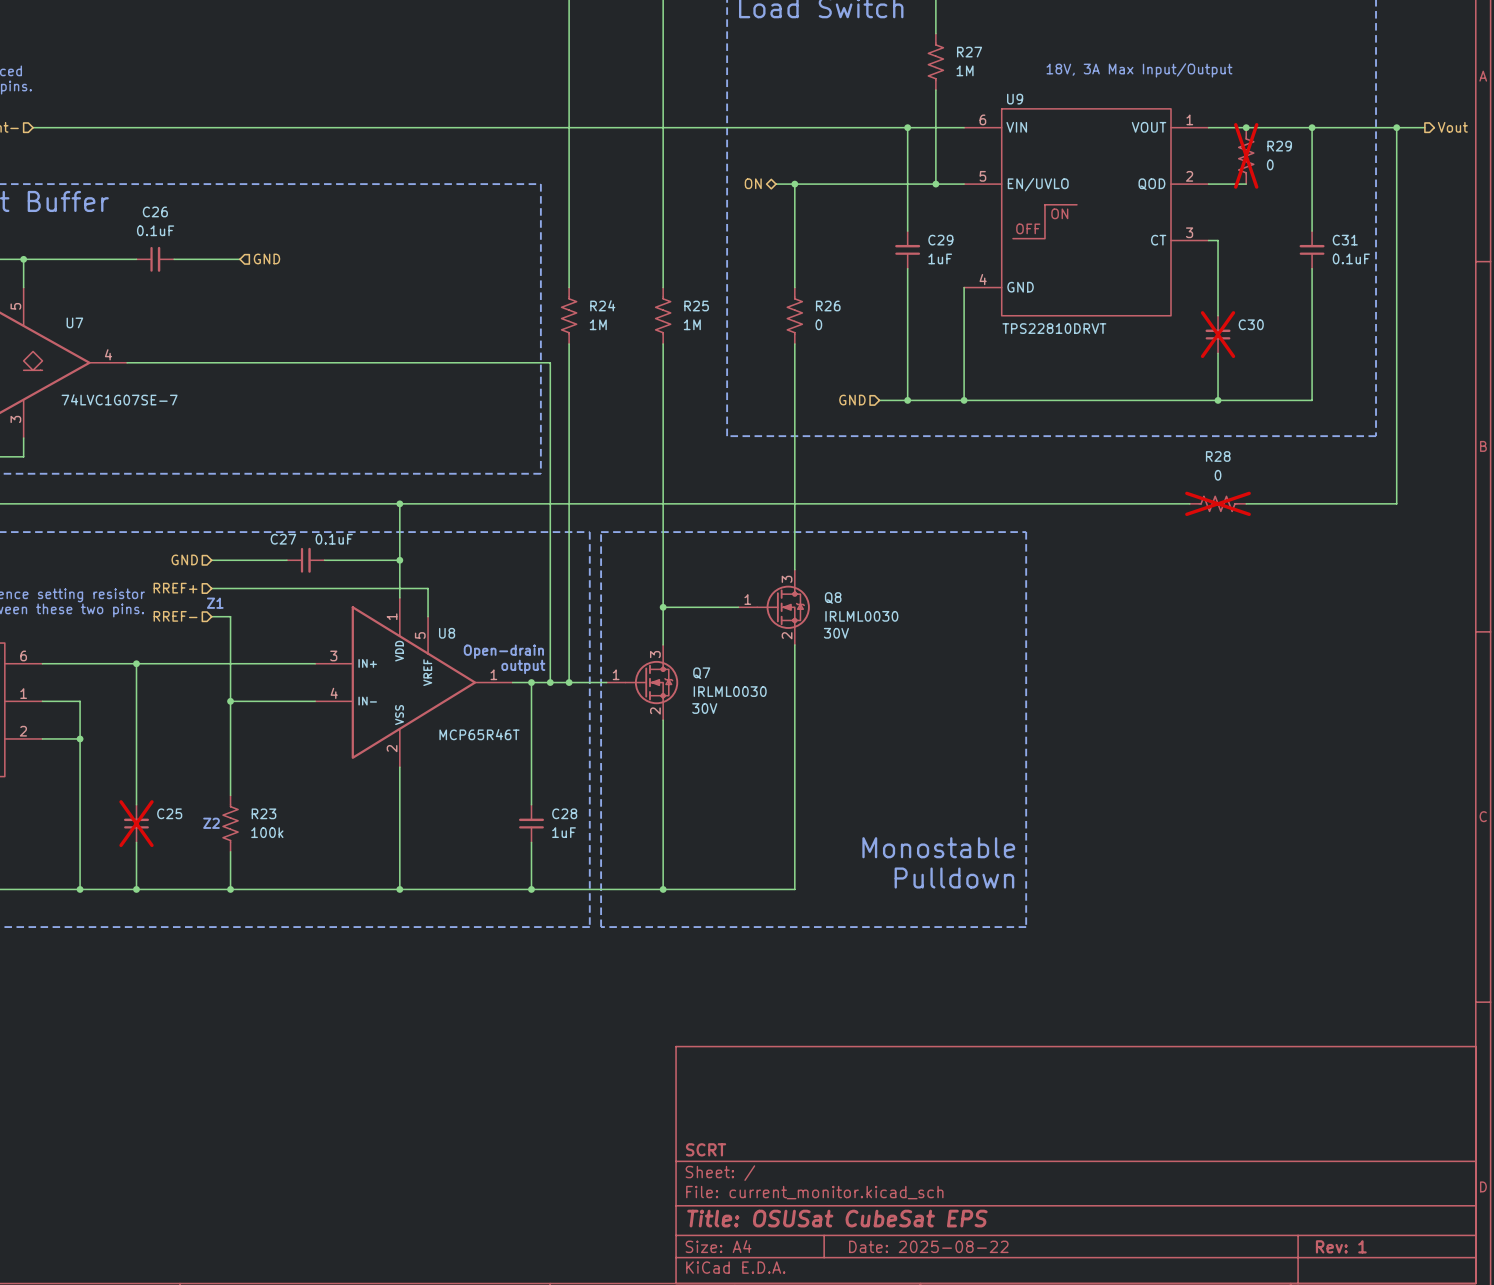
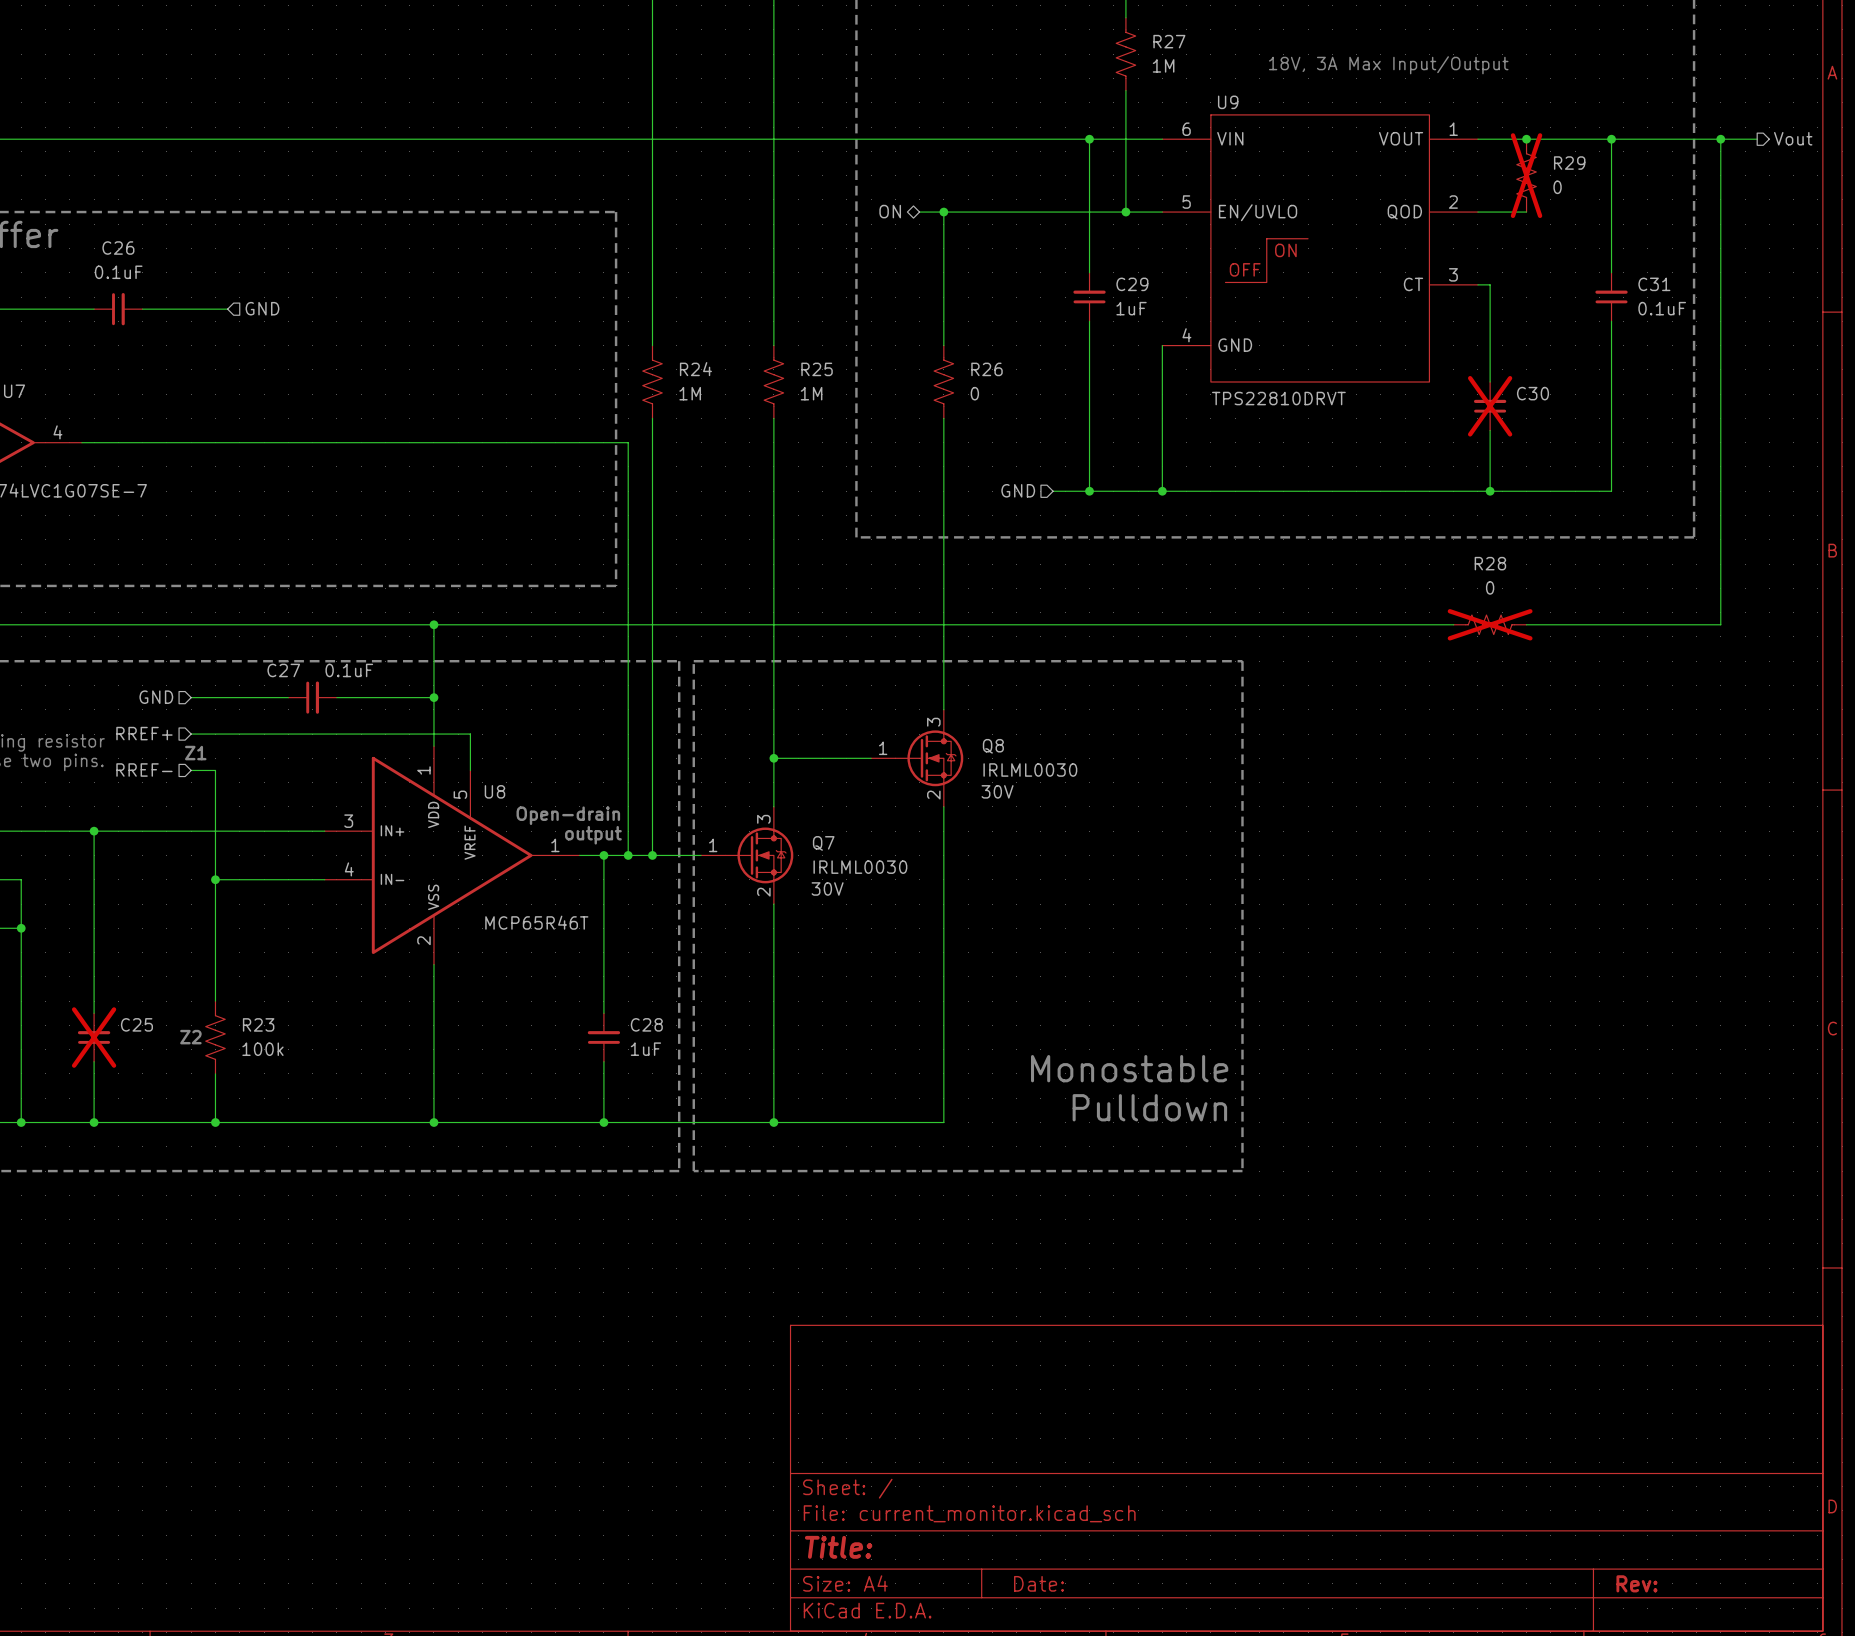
title block: SCRT (706, 1149) -> none
title block: Title: OSUSat CubeSat EPS (837, 1218) -> Title: (838, 1547)
title block: Date: 2025-08-22 (928, 1246) -> Date: (1038, 1583)
title block: Rev: 1 (1341, 1246) -> Rev: (1636, 1583)

